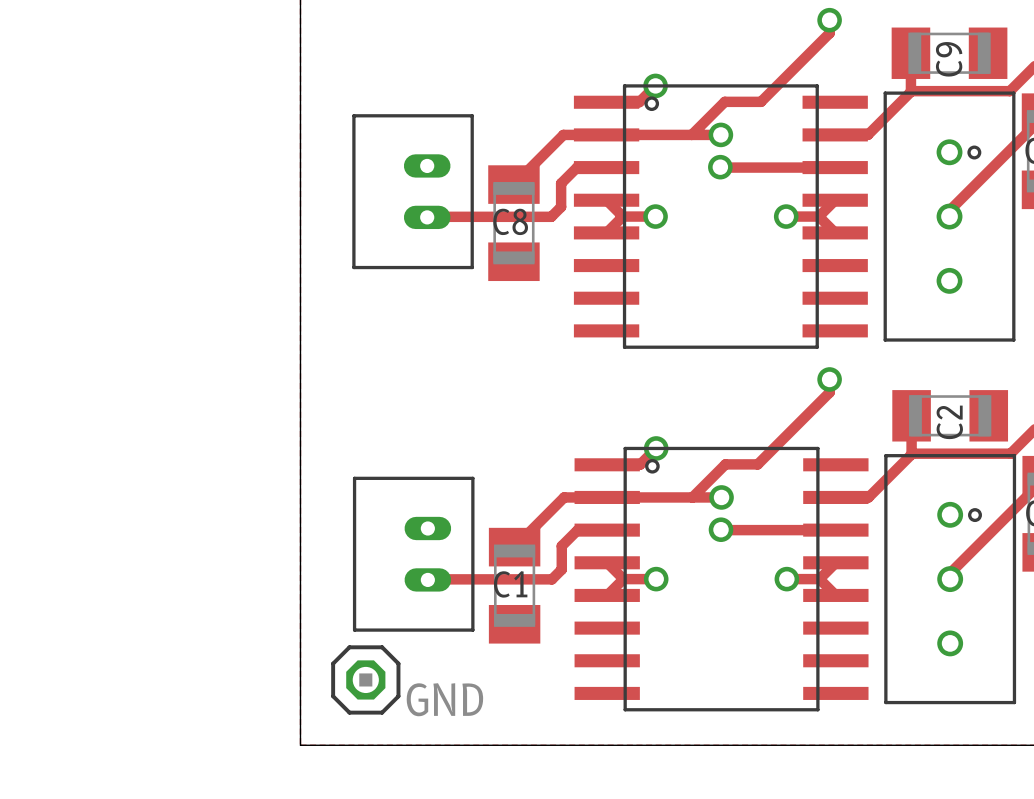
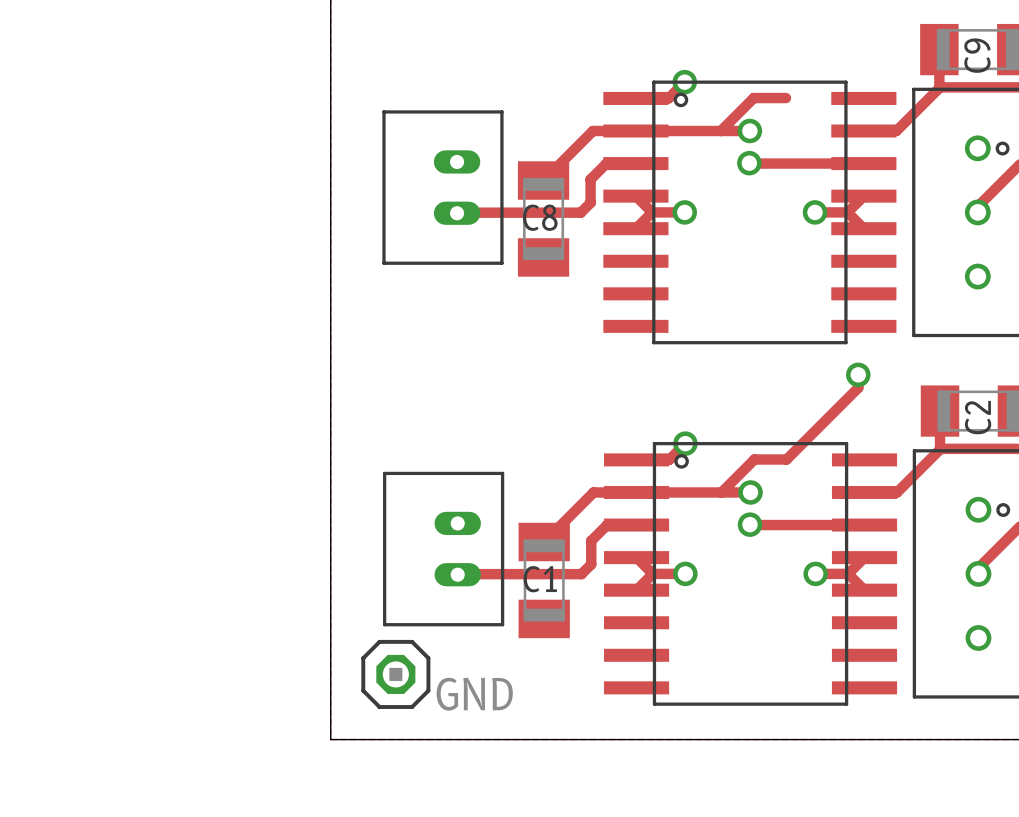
track: (829, 20) (829, 33) (761, 101) (757, 101) -> none
via: (829, 20) -> none

